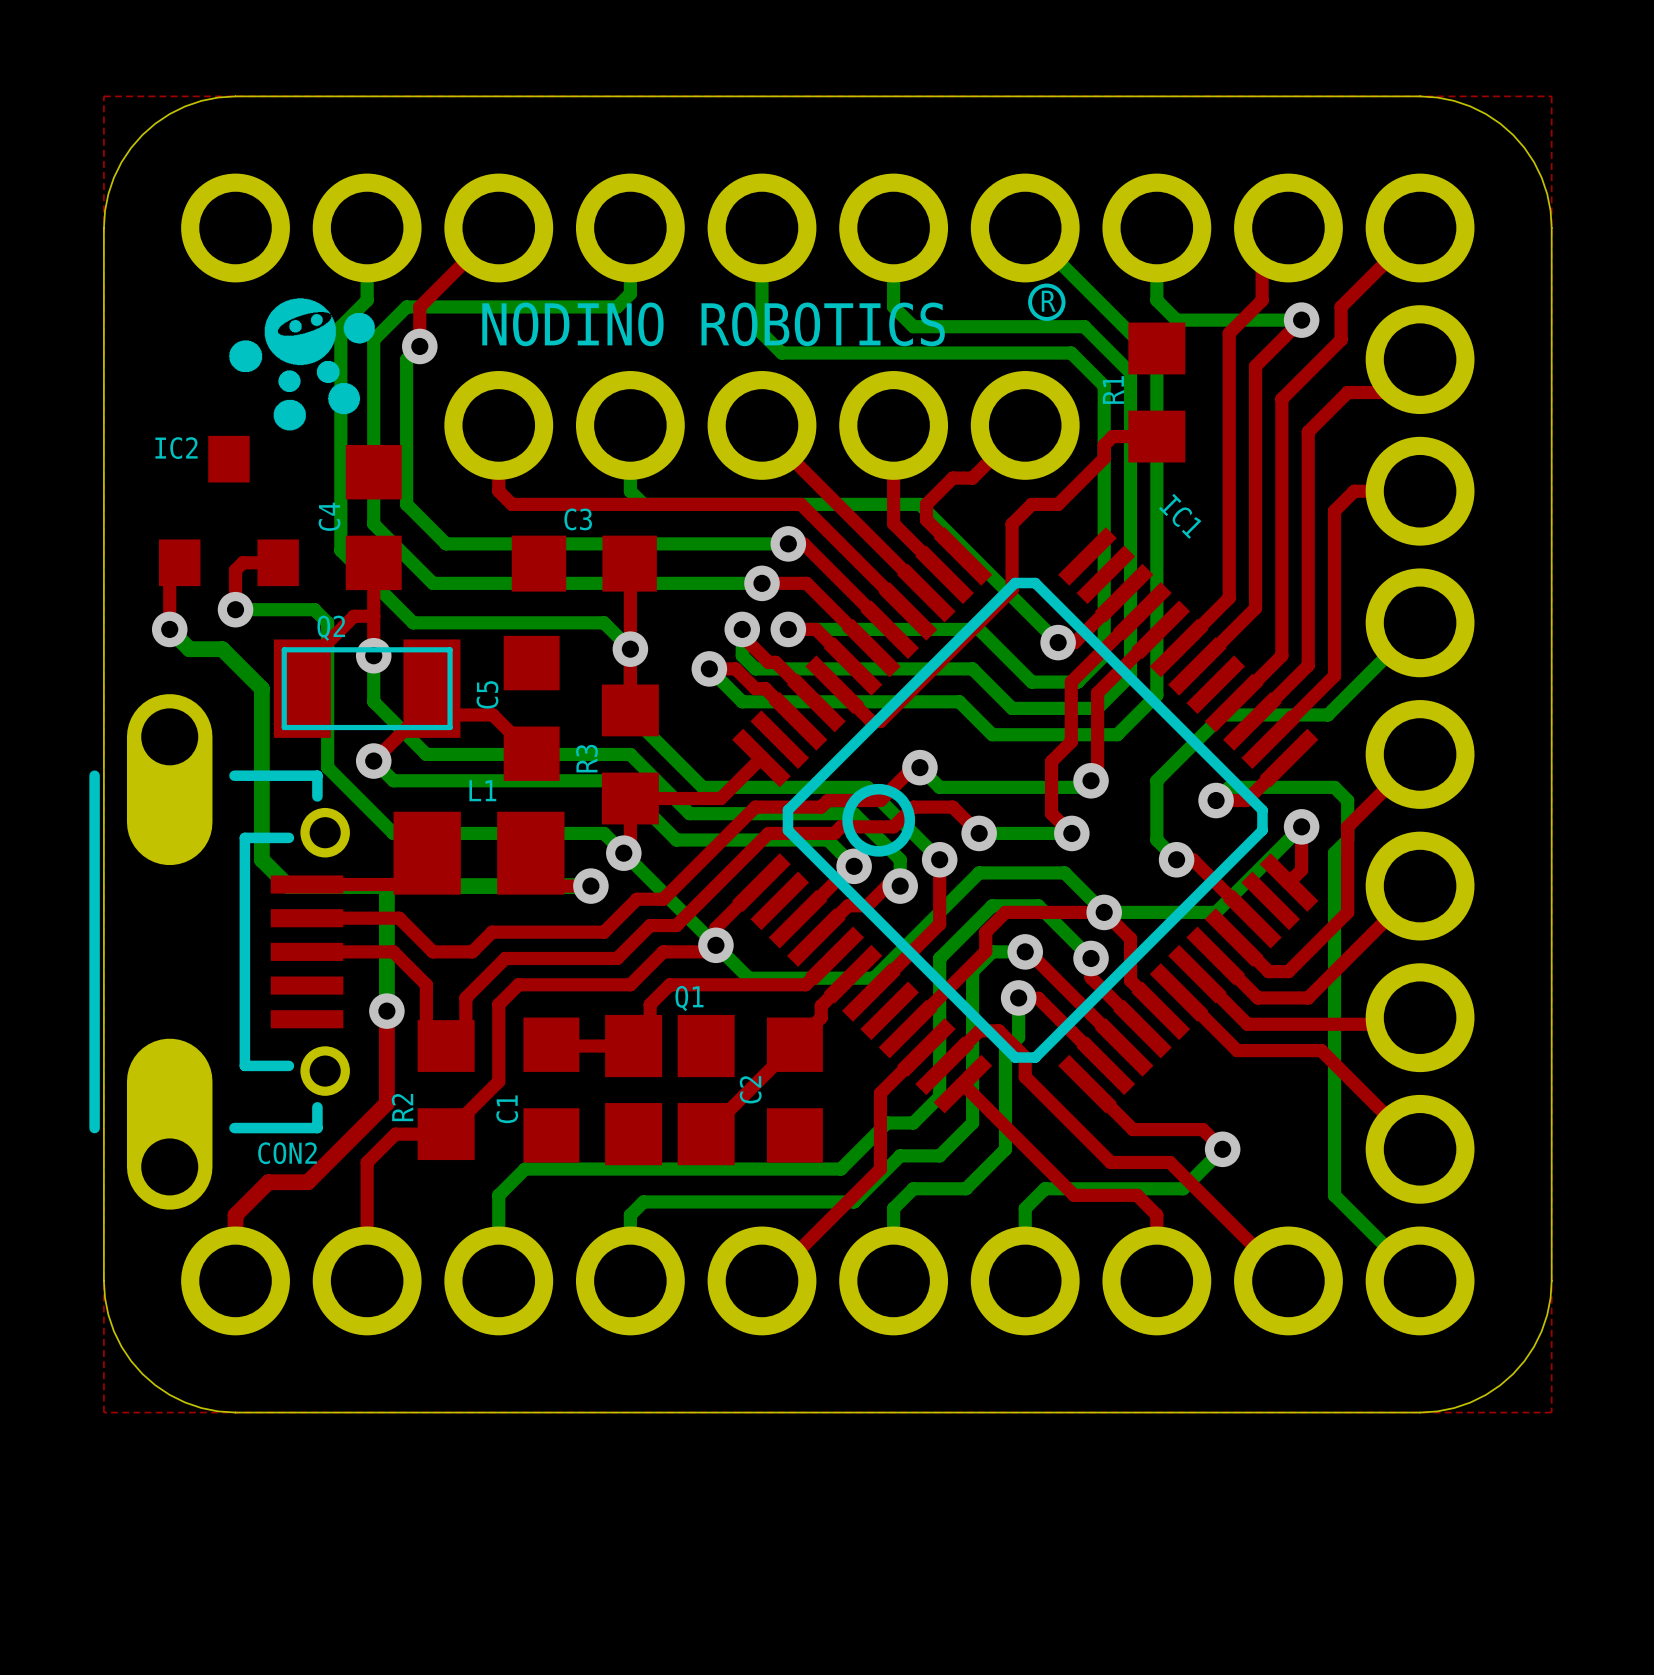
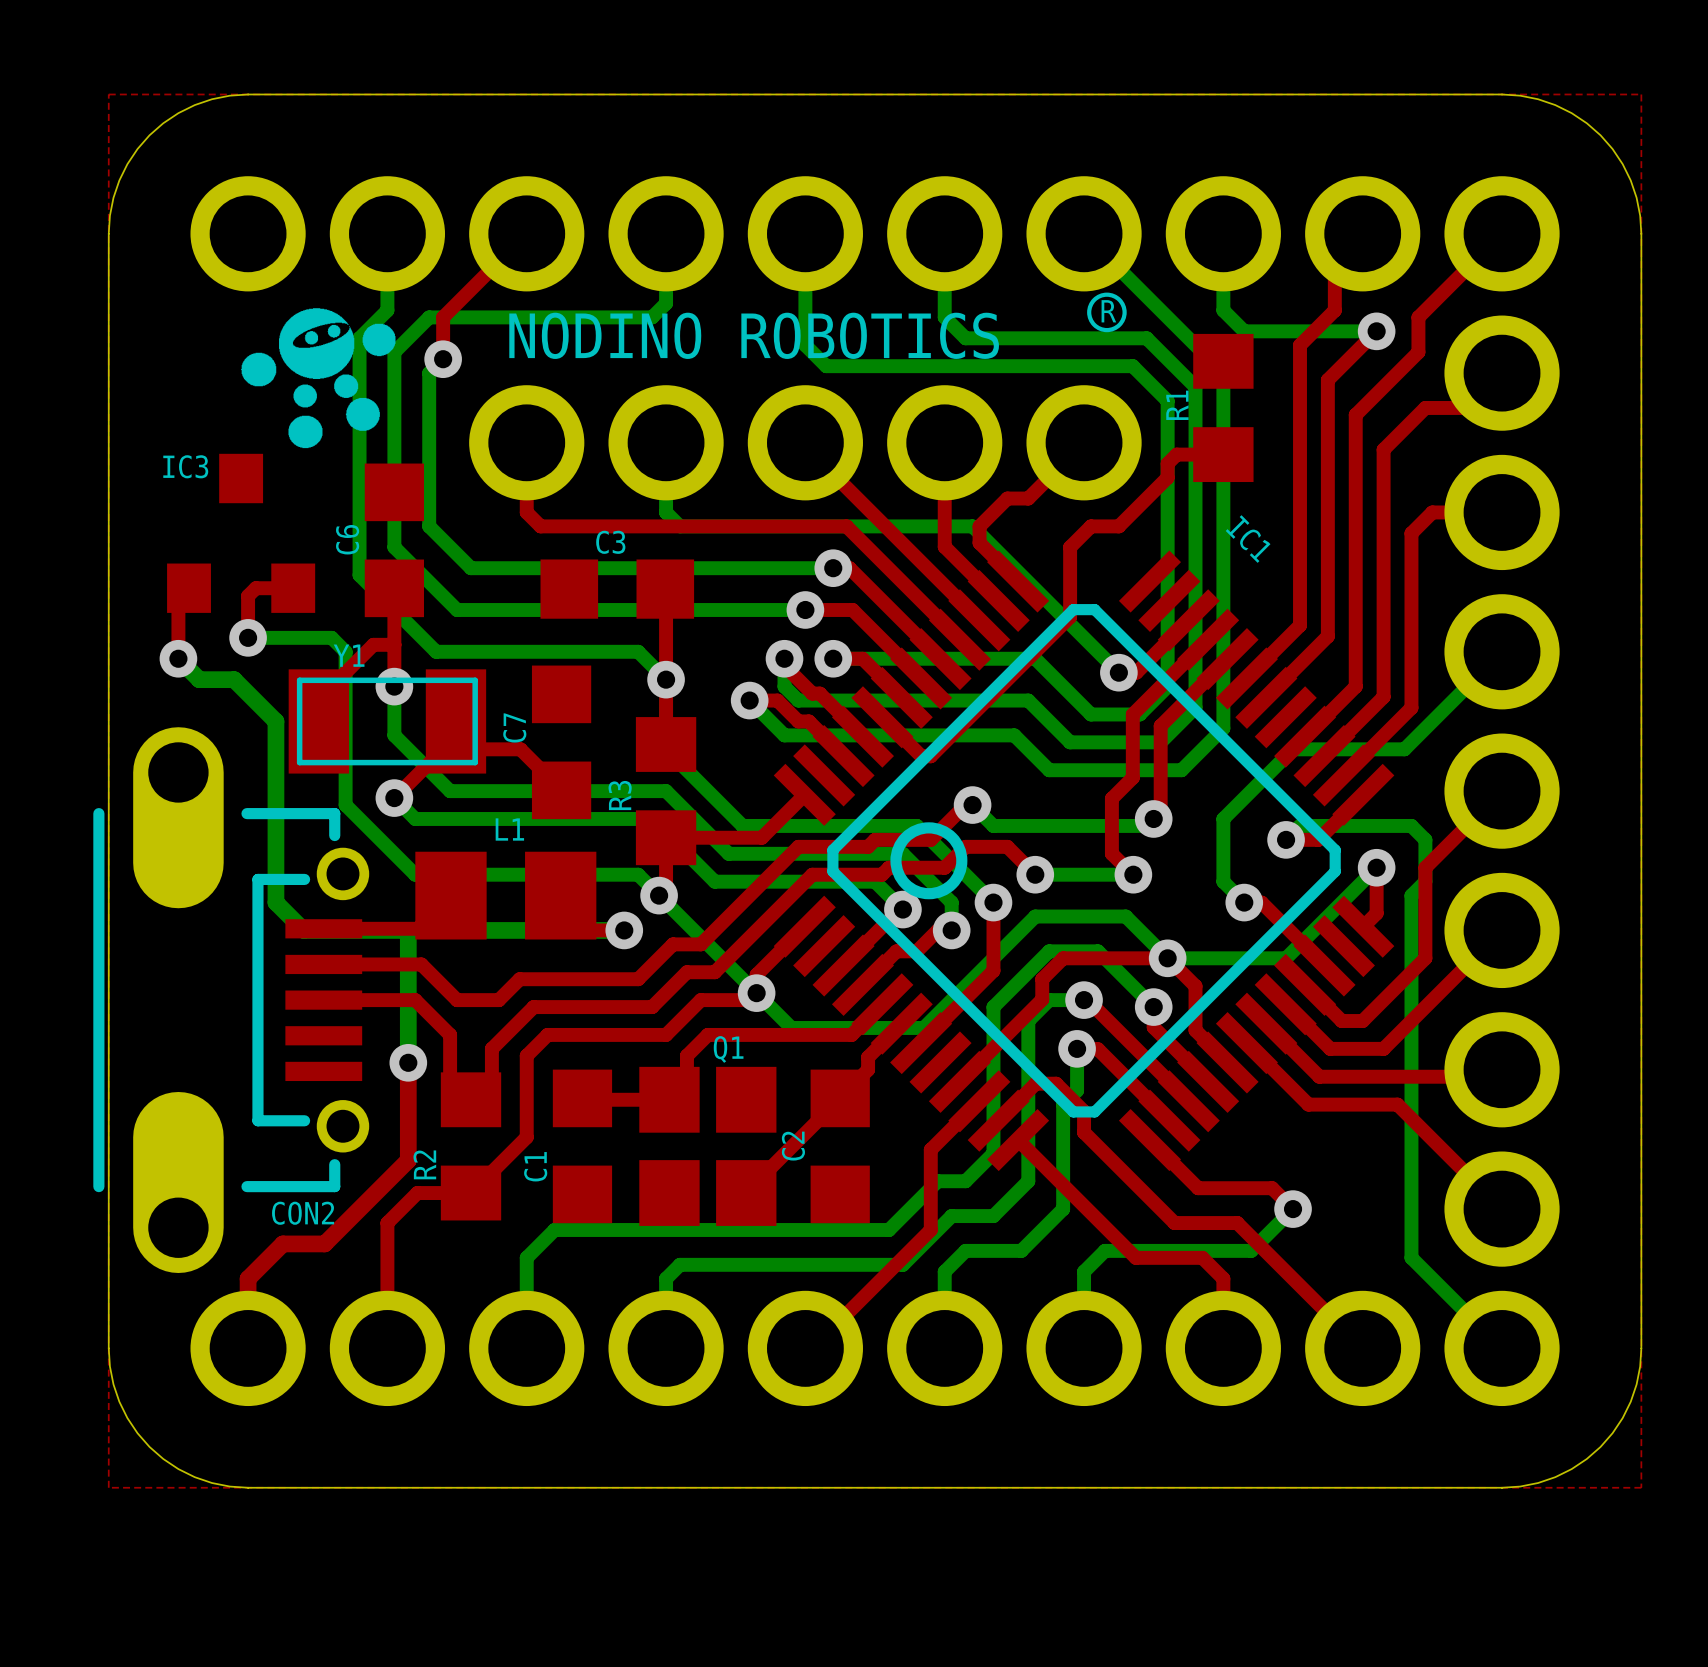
IC2 name: IC2 (176, 448) -> IC3 (185, 466)
C4 name: C4 (329, 516) -> C6 (347, 539)
Q2 name: Q2 (331, 628) -> Y1 (349, 655)
C5 name: C5 (487, 694) -> C7 (514, 727)

